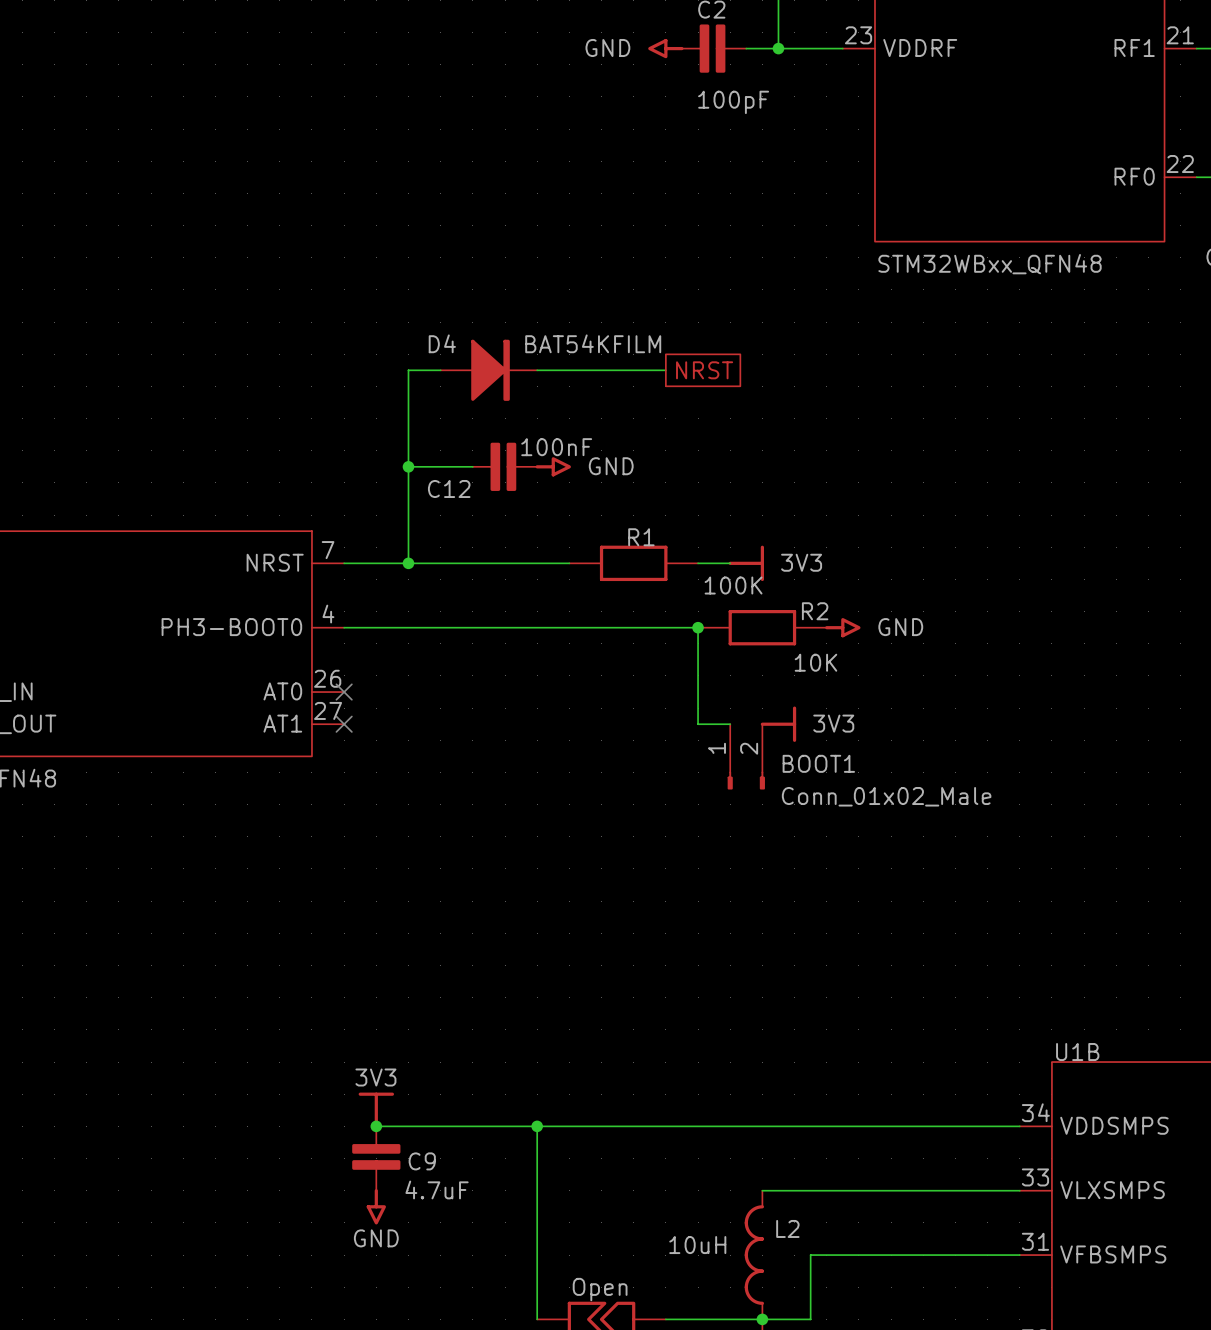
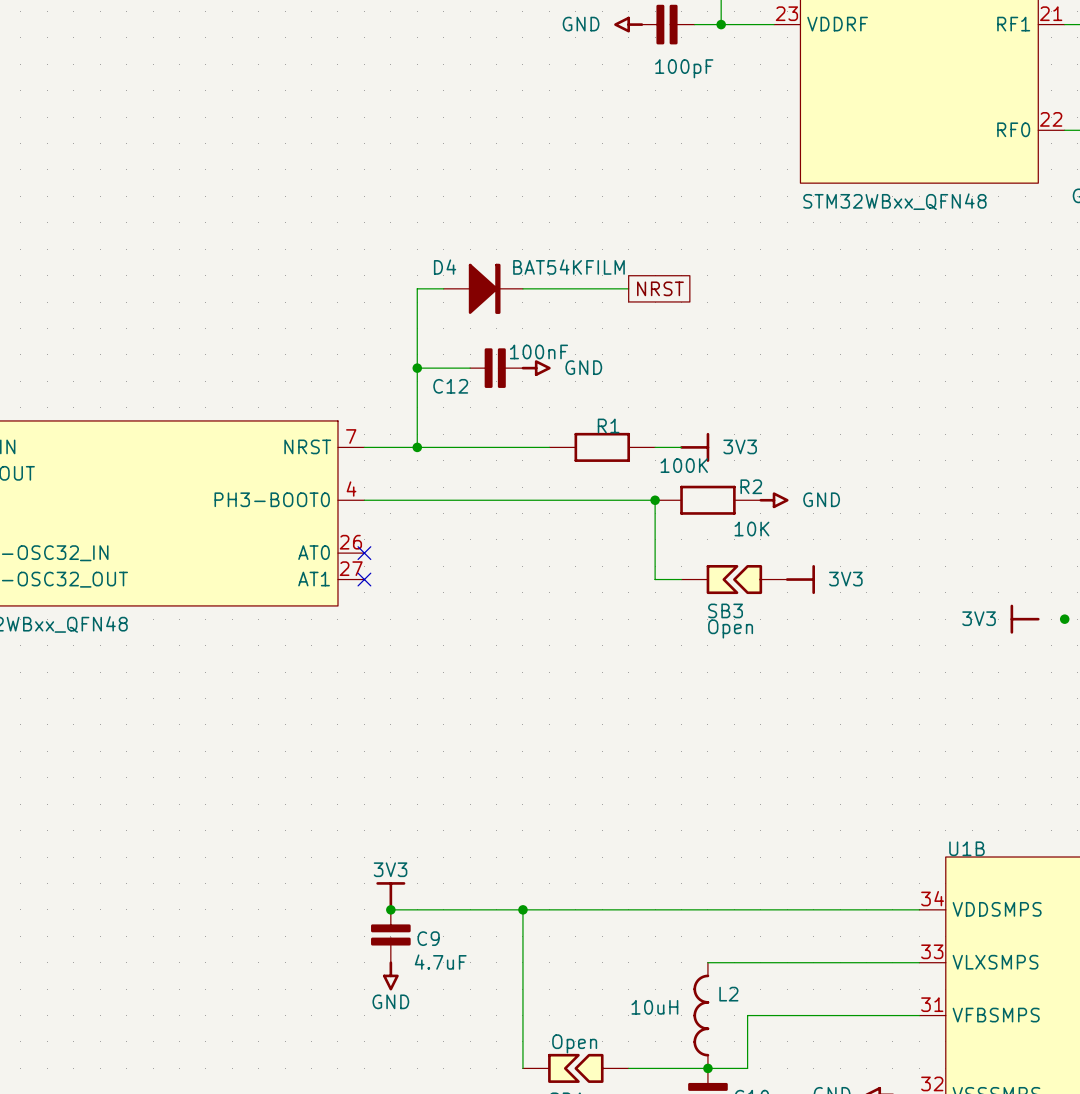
power symbol position: 3V3 (778, 724) -> 3V3 (800, 579)
SB3: none -> Open (734, 579)
BOOT1: Conn_01x02_Male (746, 756) -> none
power symbol: none -> 3V3 (1025, 619)
junction: none -> (1064, 619)

